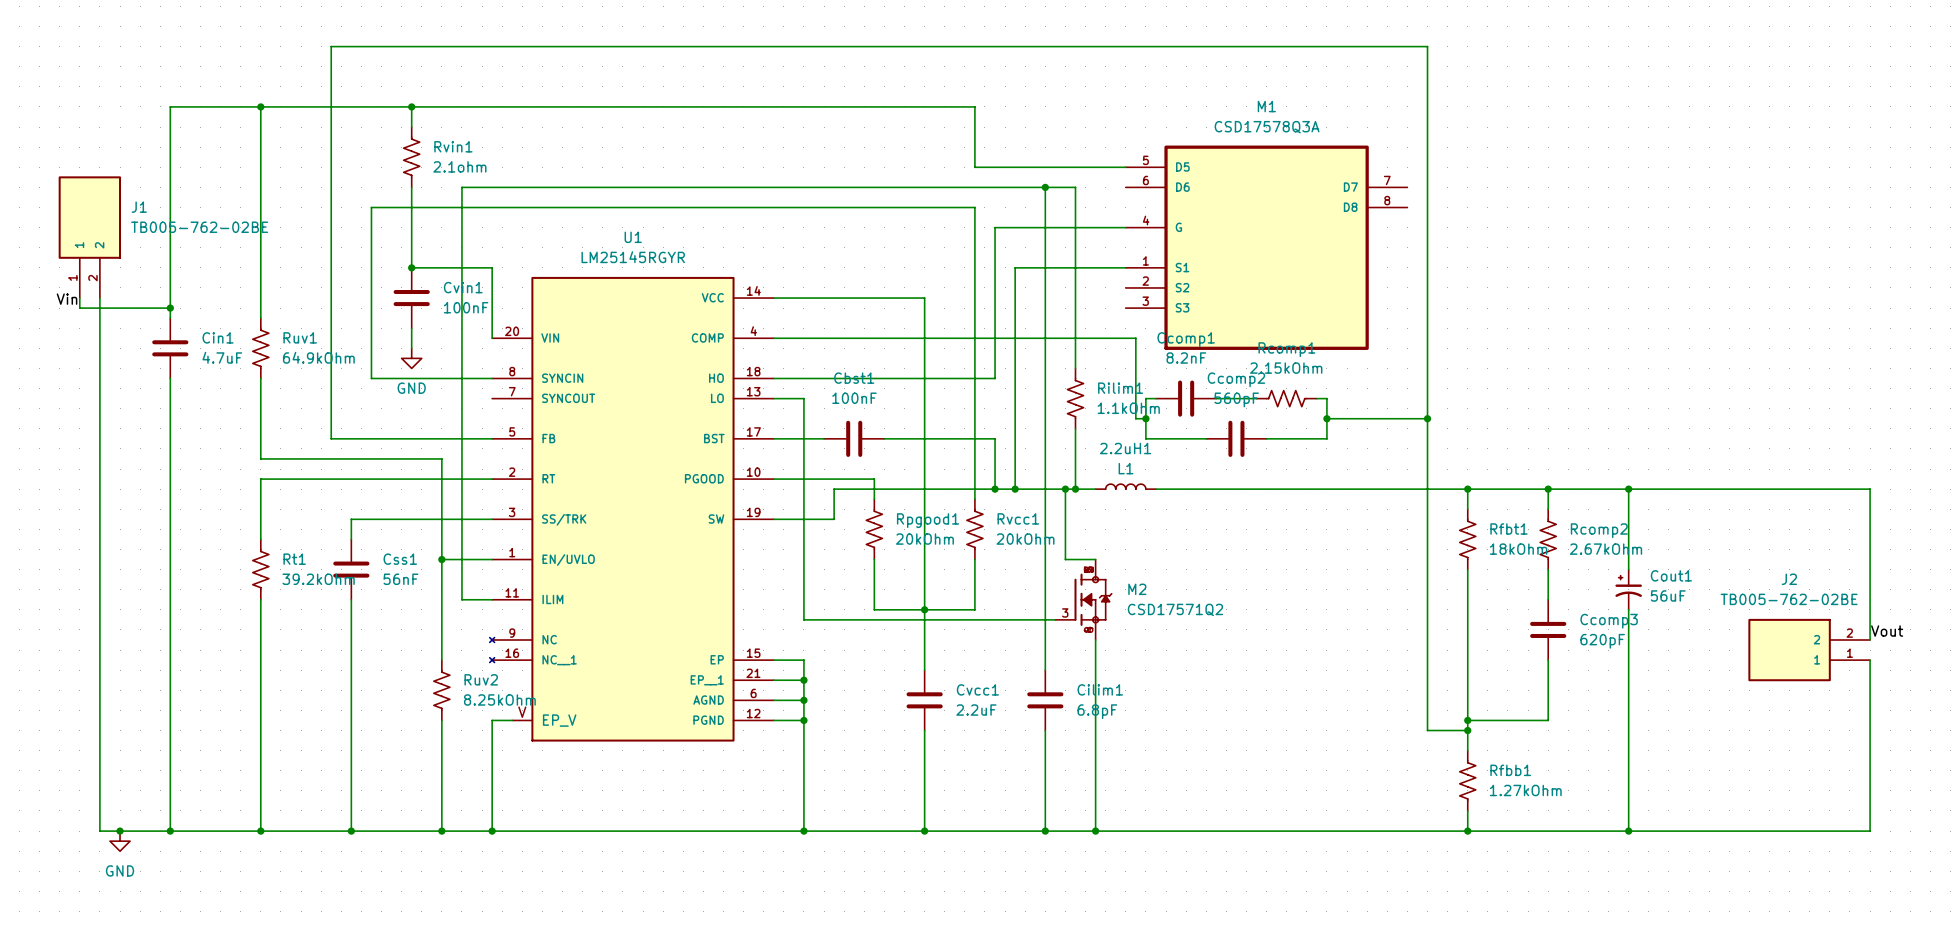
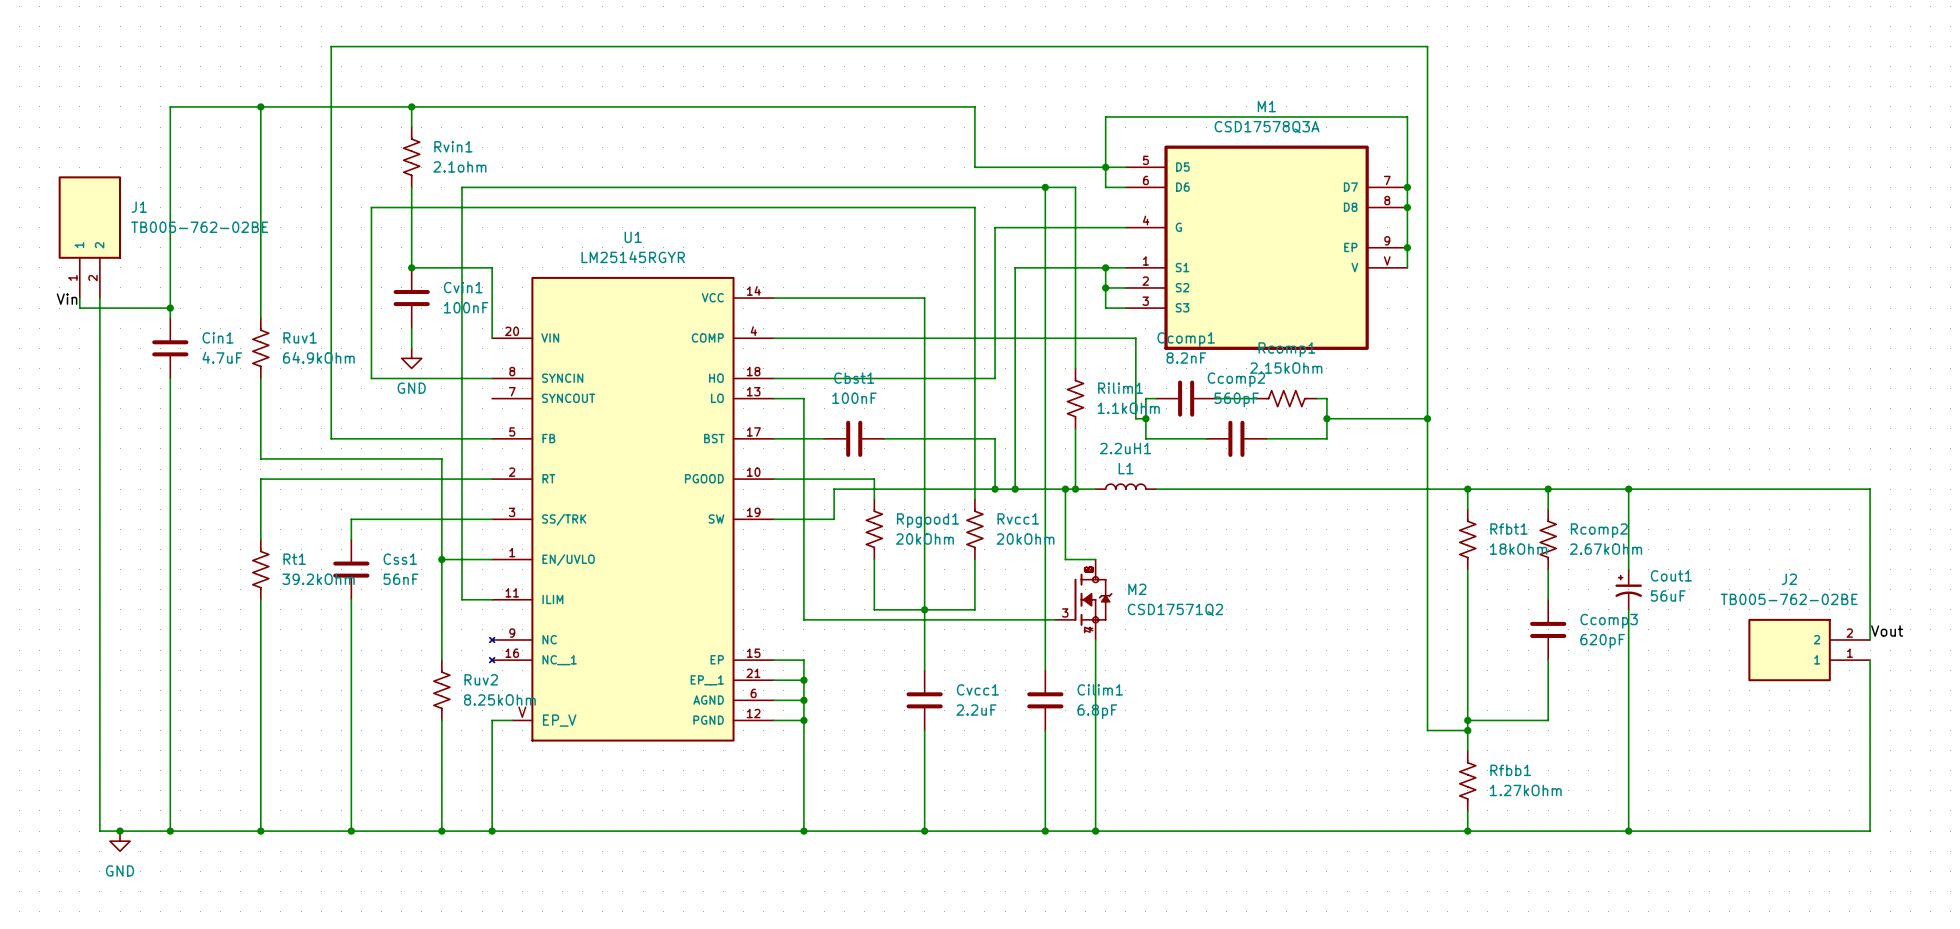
M1 symbol: [1125, 145, 1408, 350] -> [1125, 145, 1408, 350]
junction: none -> (1105, 167)
wire: none -> (1125, 187) (1105, 187) (1105, 117) (1407, 117) (1407, 267)
junction: none -> (1407, 187)
junction: none -> (1407, 207)
junction: none -> (1407, 247)
wire: none -> (1105, 267) (1105, 308) (1125, 308)
junction: none -> (1105, 267)
wire: none -> (1105, 287) (1125, 287)
junction: none -> (1105, 287)
M2 symbol: [1055, 559, 1113, 641] -> [1055, 559, 1113, 641]

